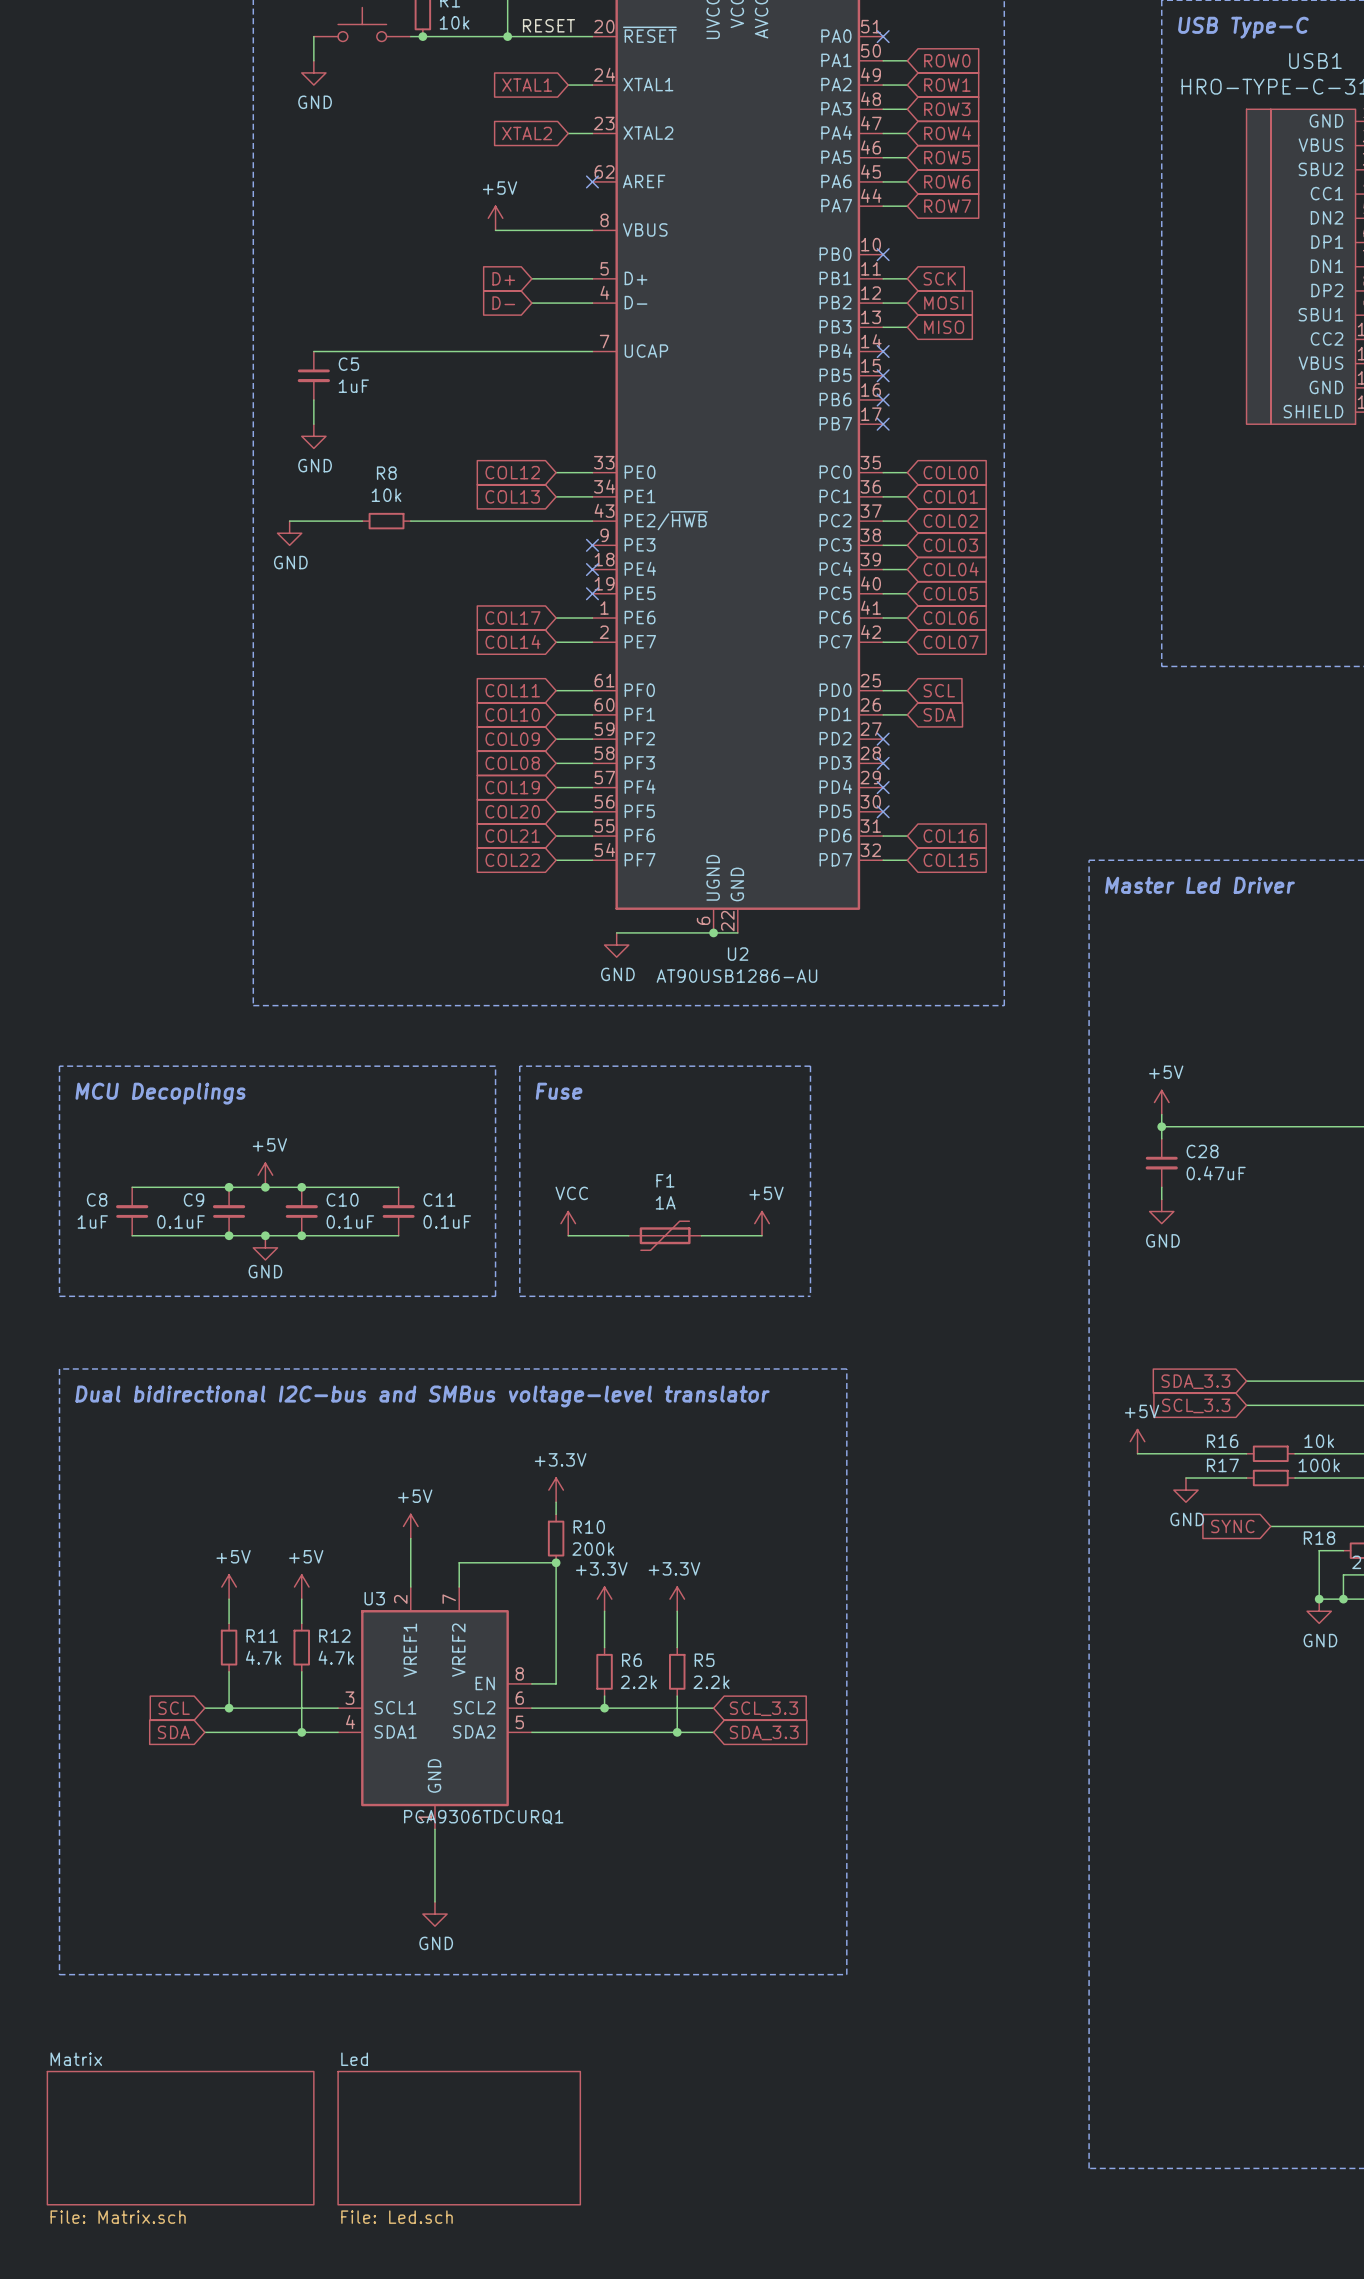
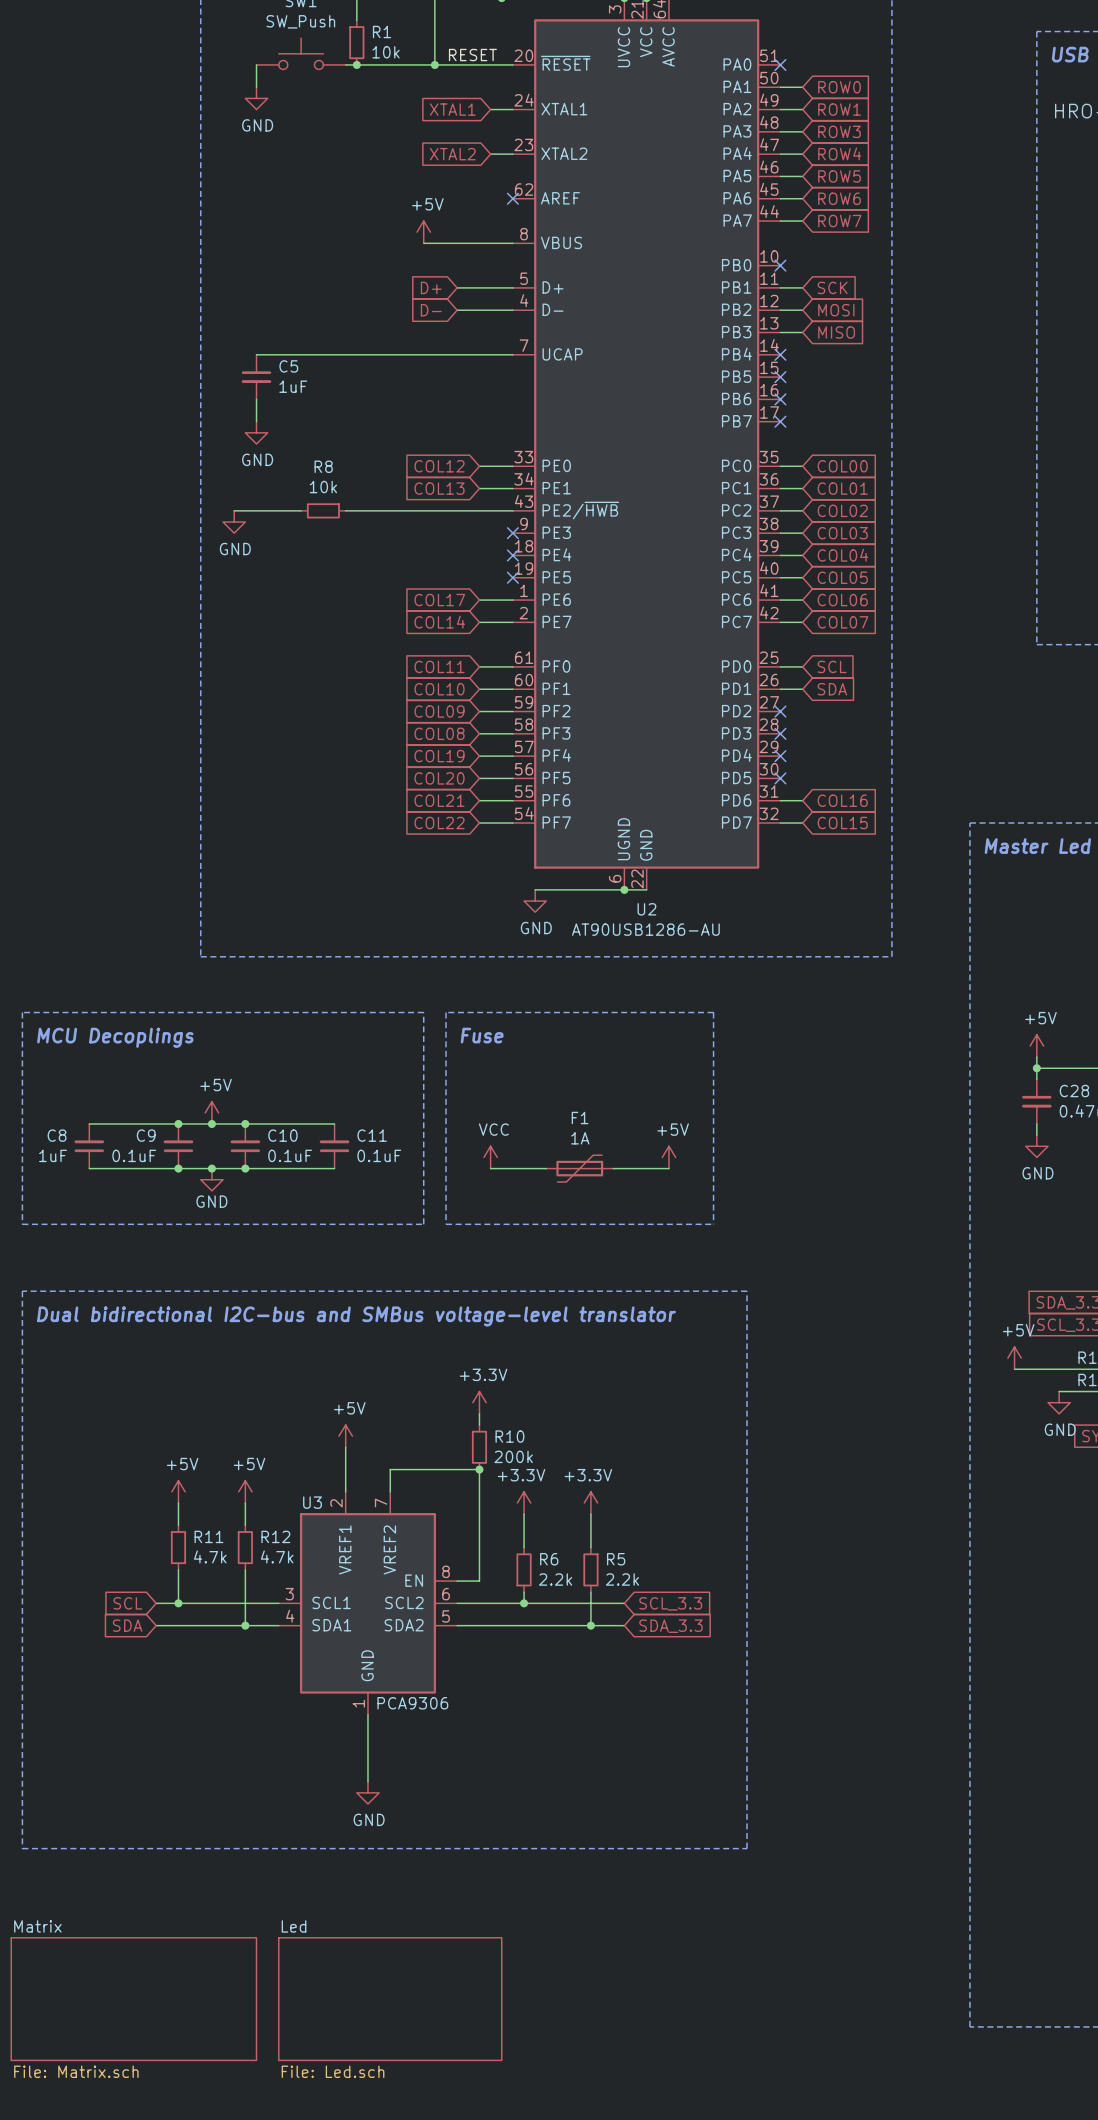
U3 value: PCA9306TDCURQ1 (483, 1817) -> PCA9306 (412, 1703)

